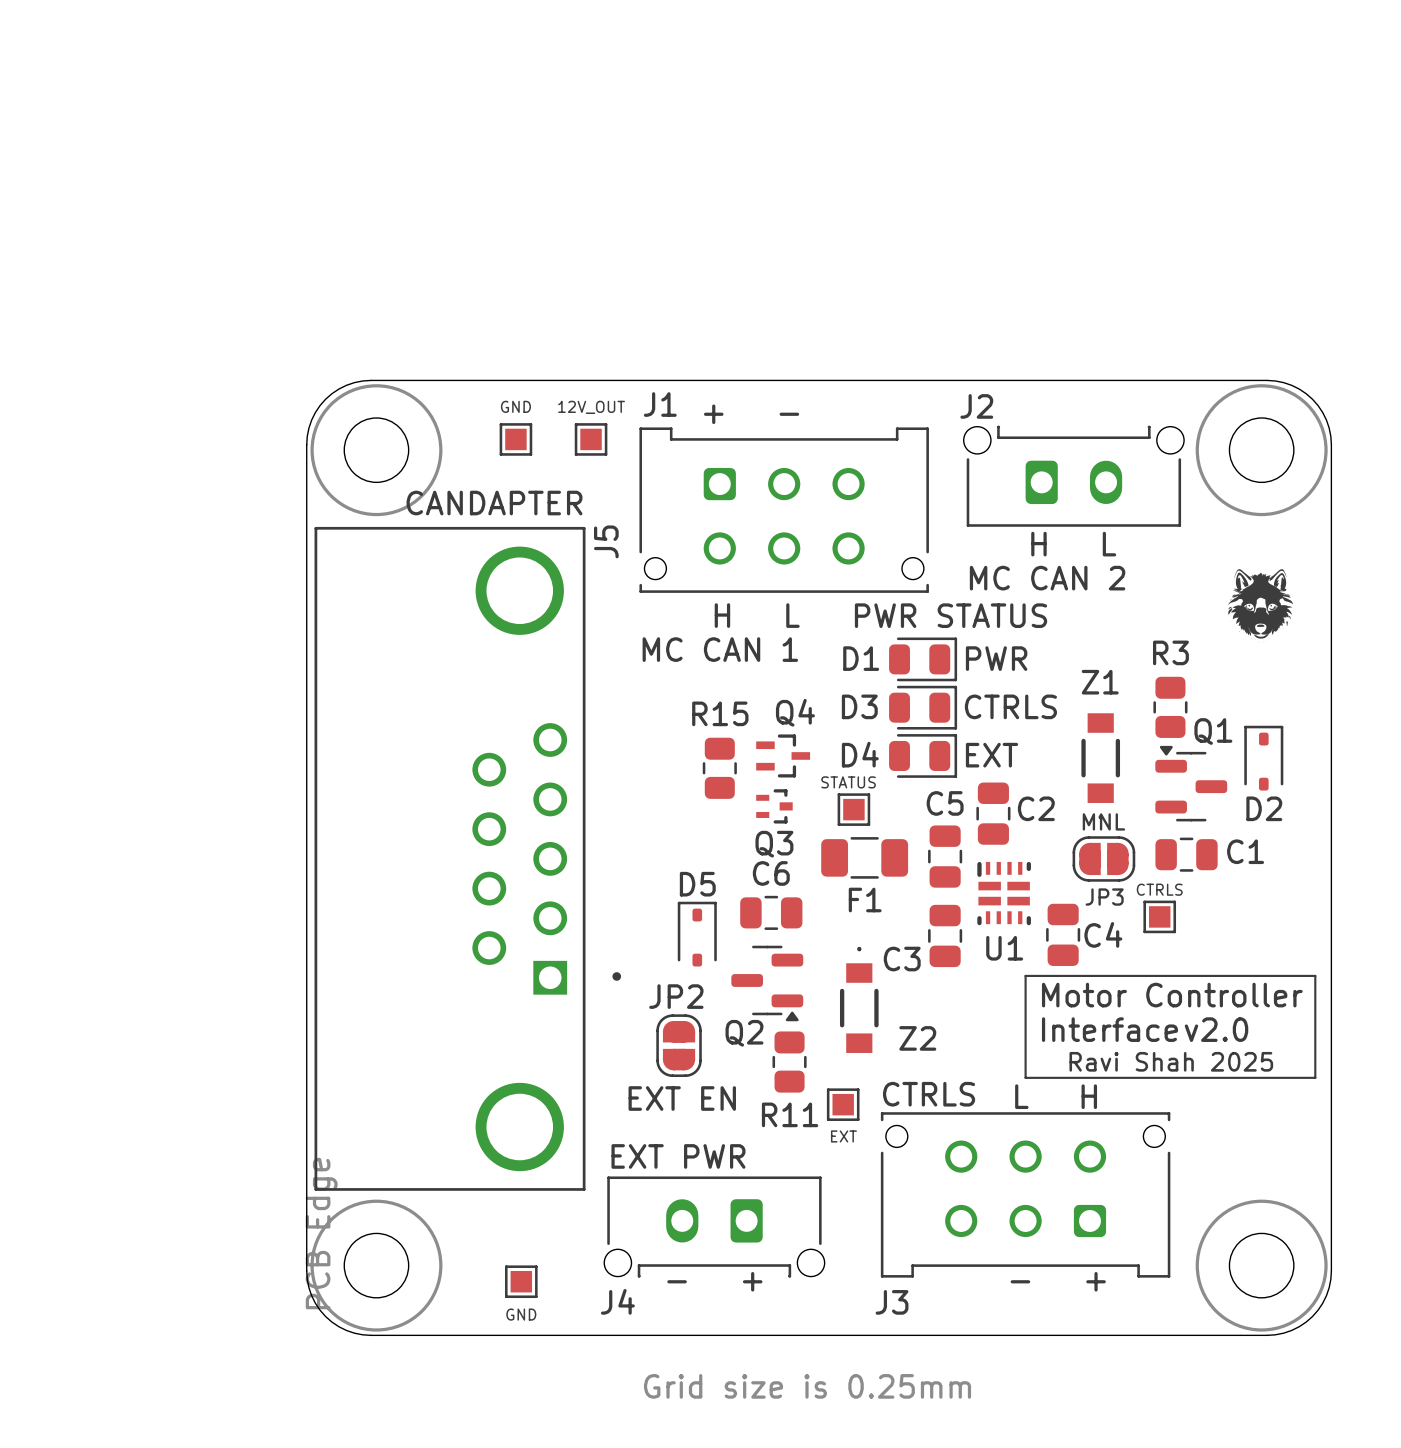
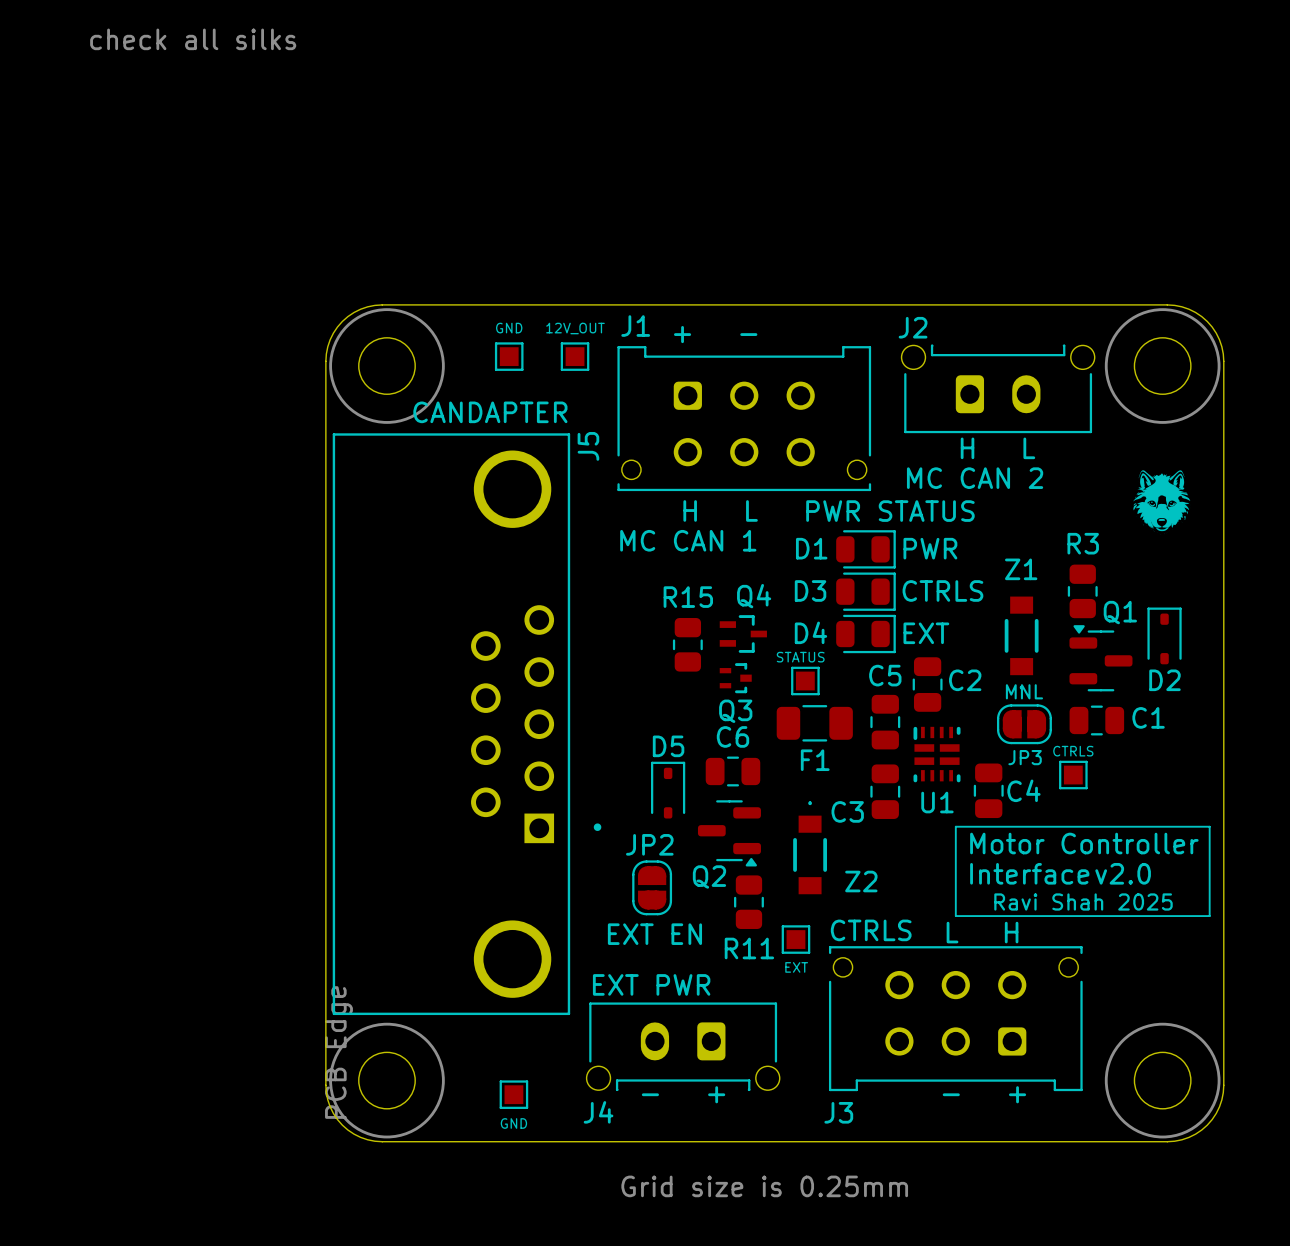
text: none -> check all silks (193, 39)

